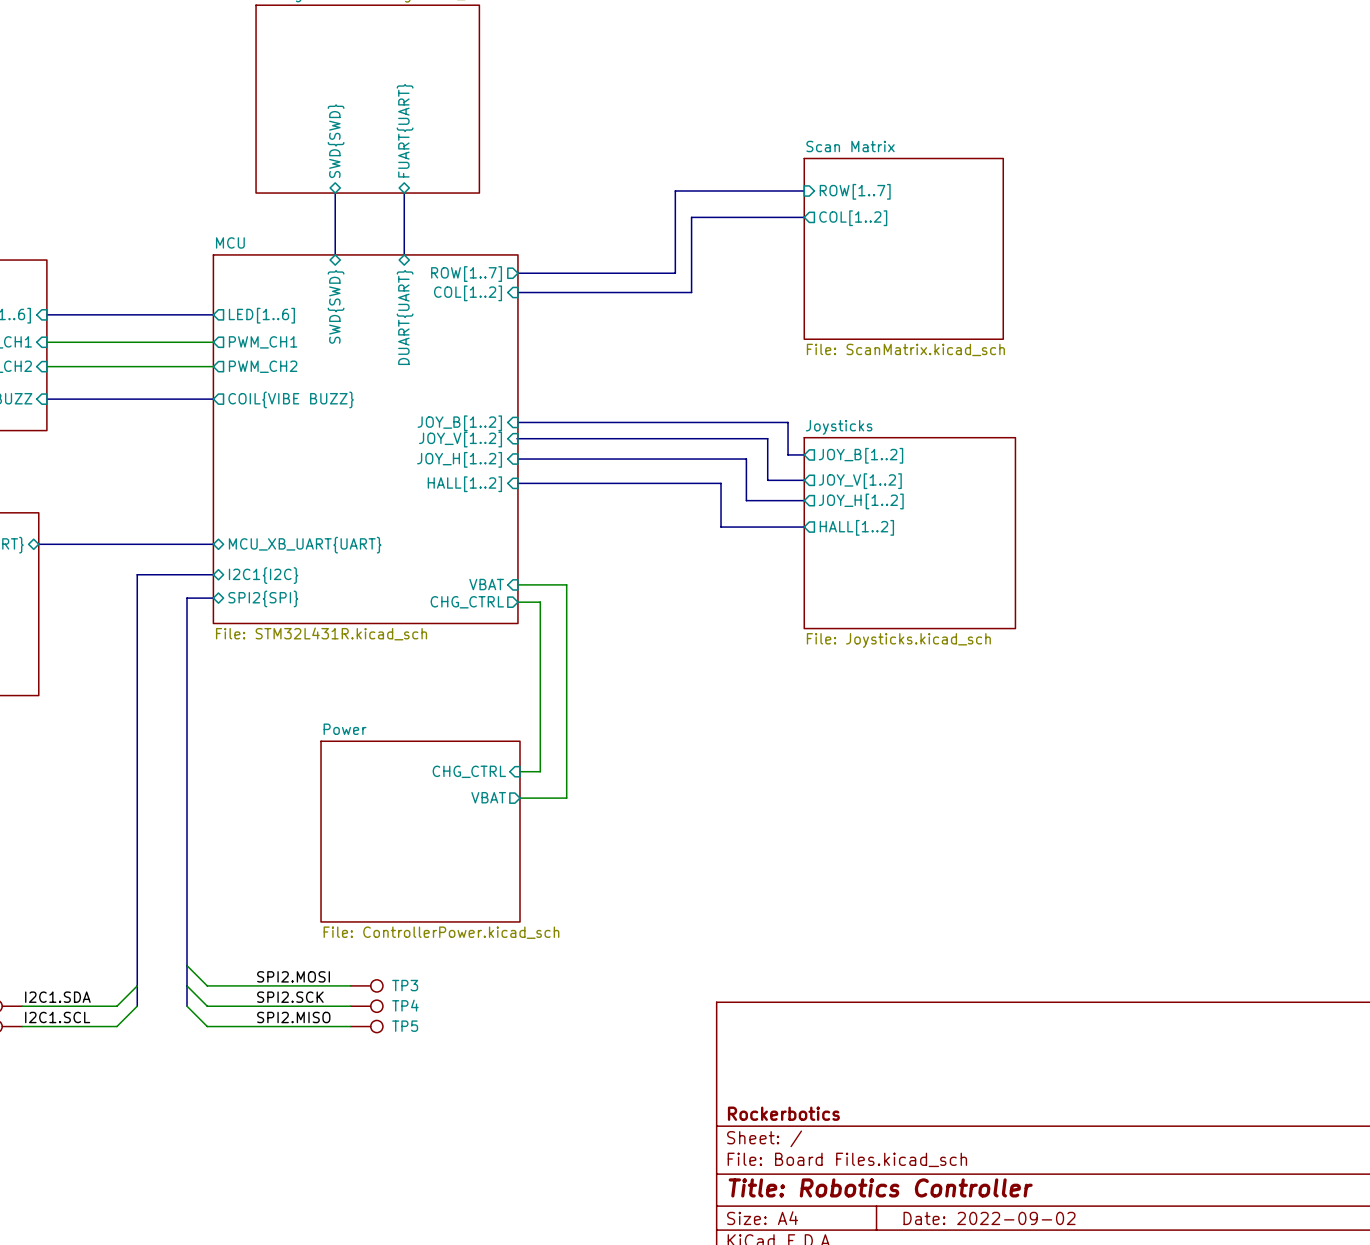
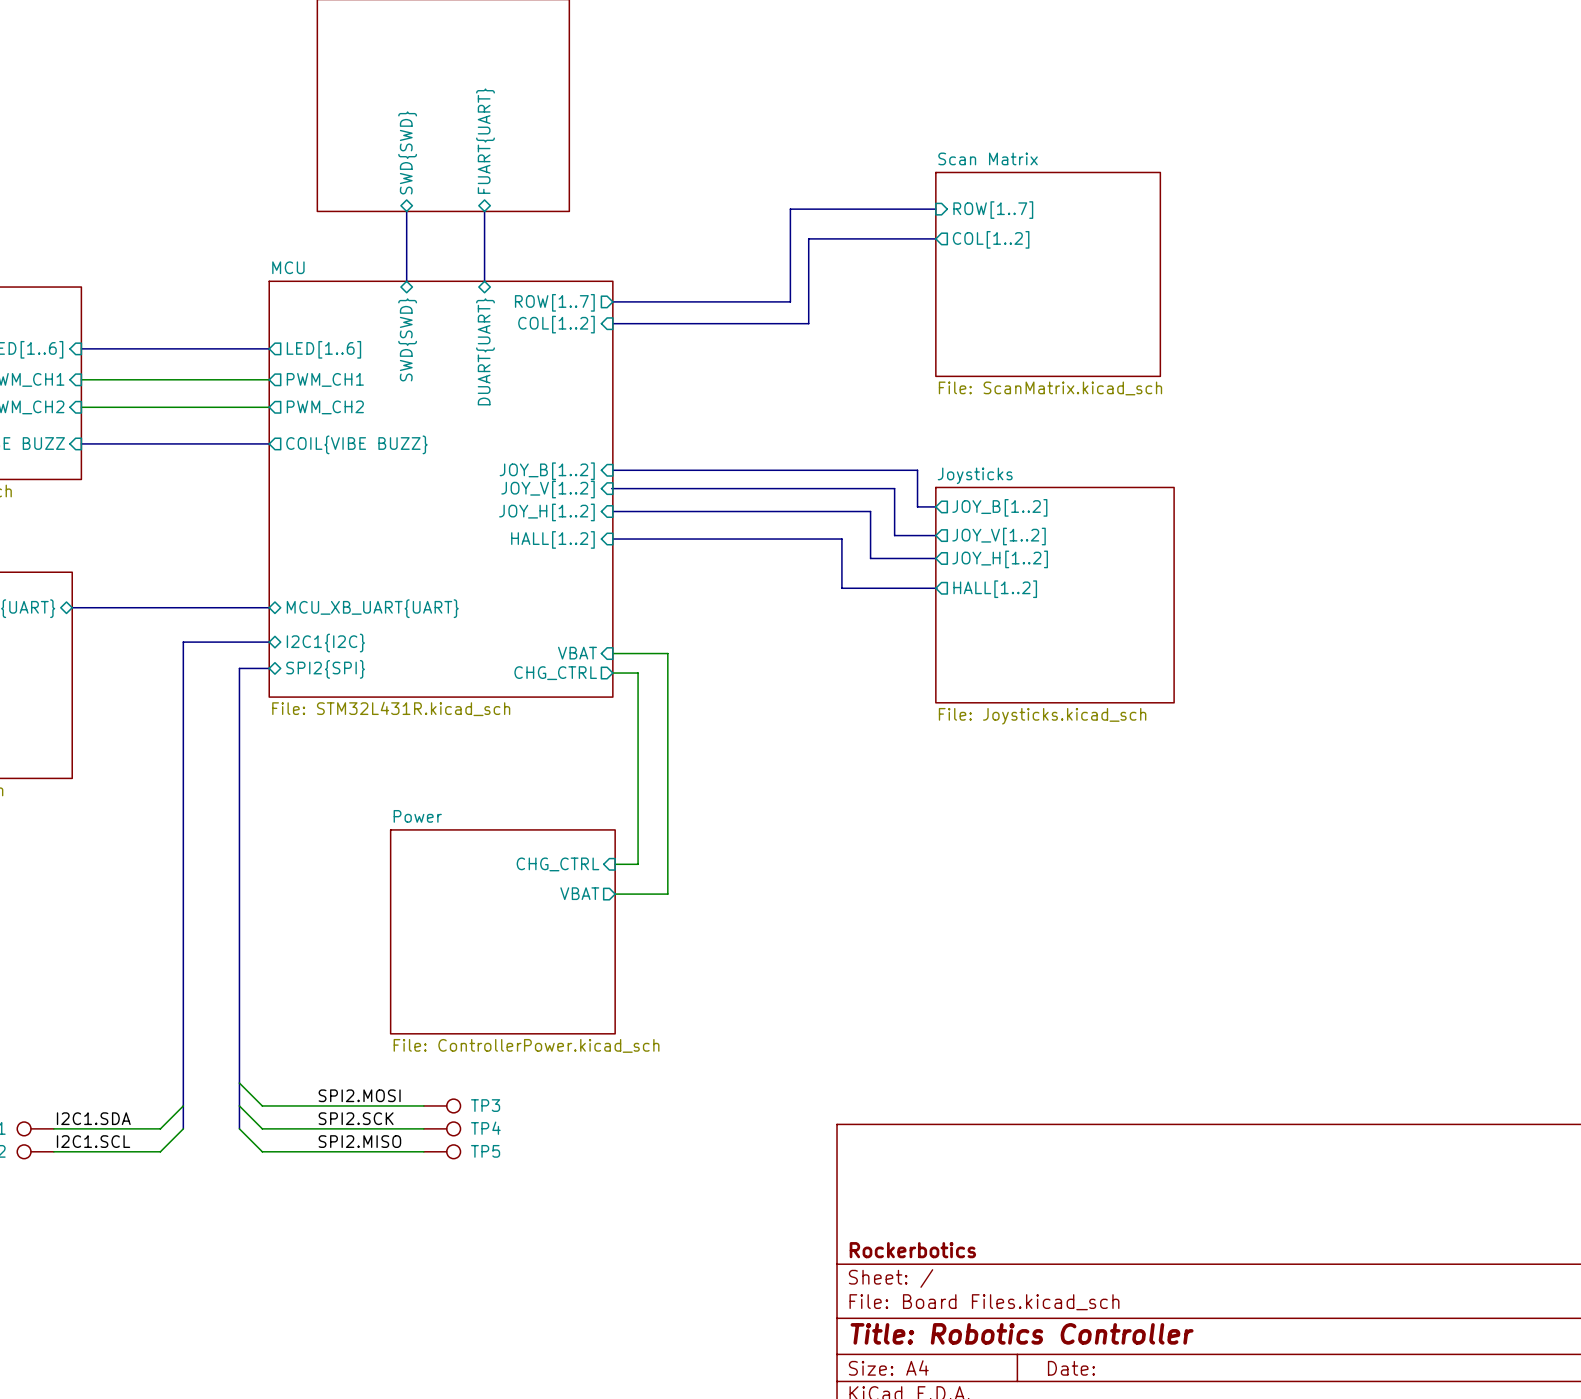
title block: Date: 2022-09-02 (989, 1218) -> Date: (1071, 1368)

